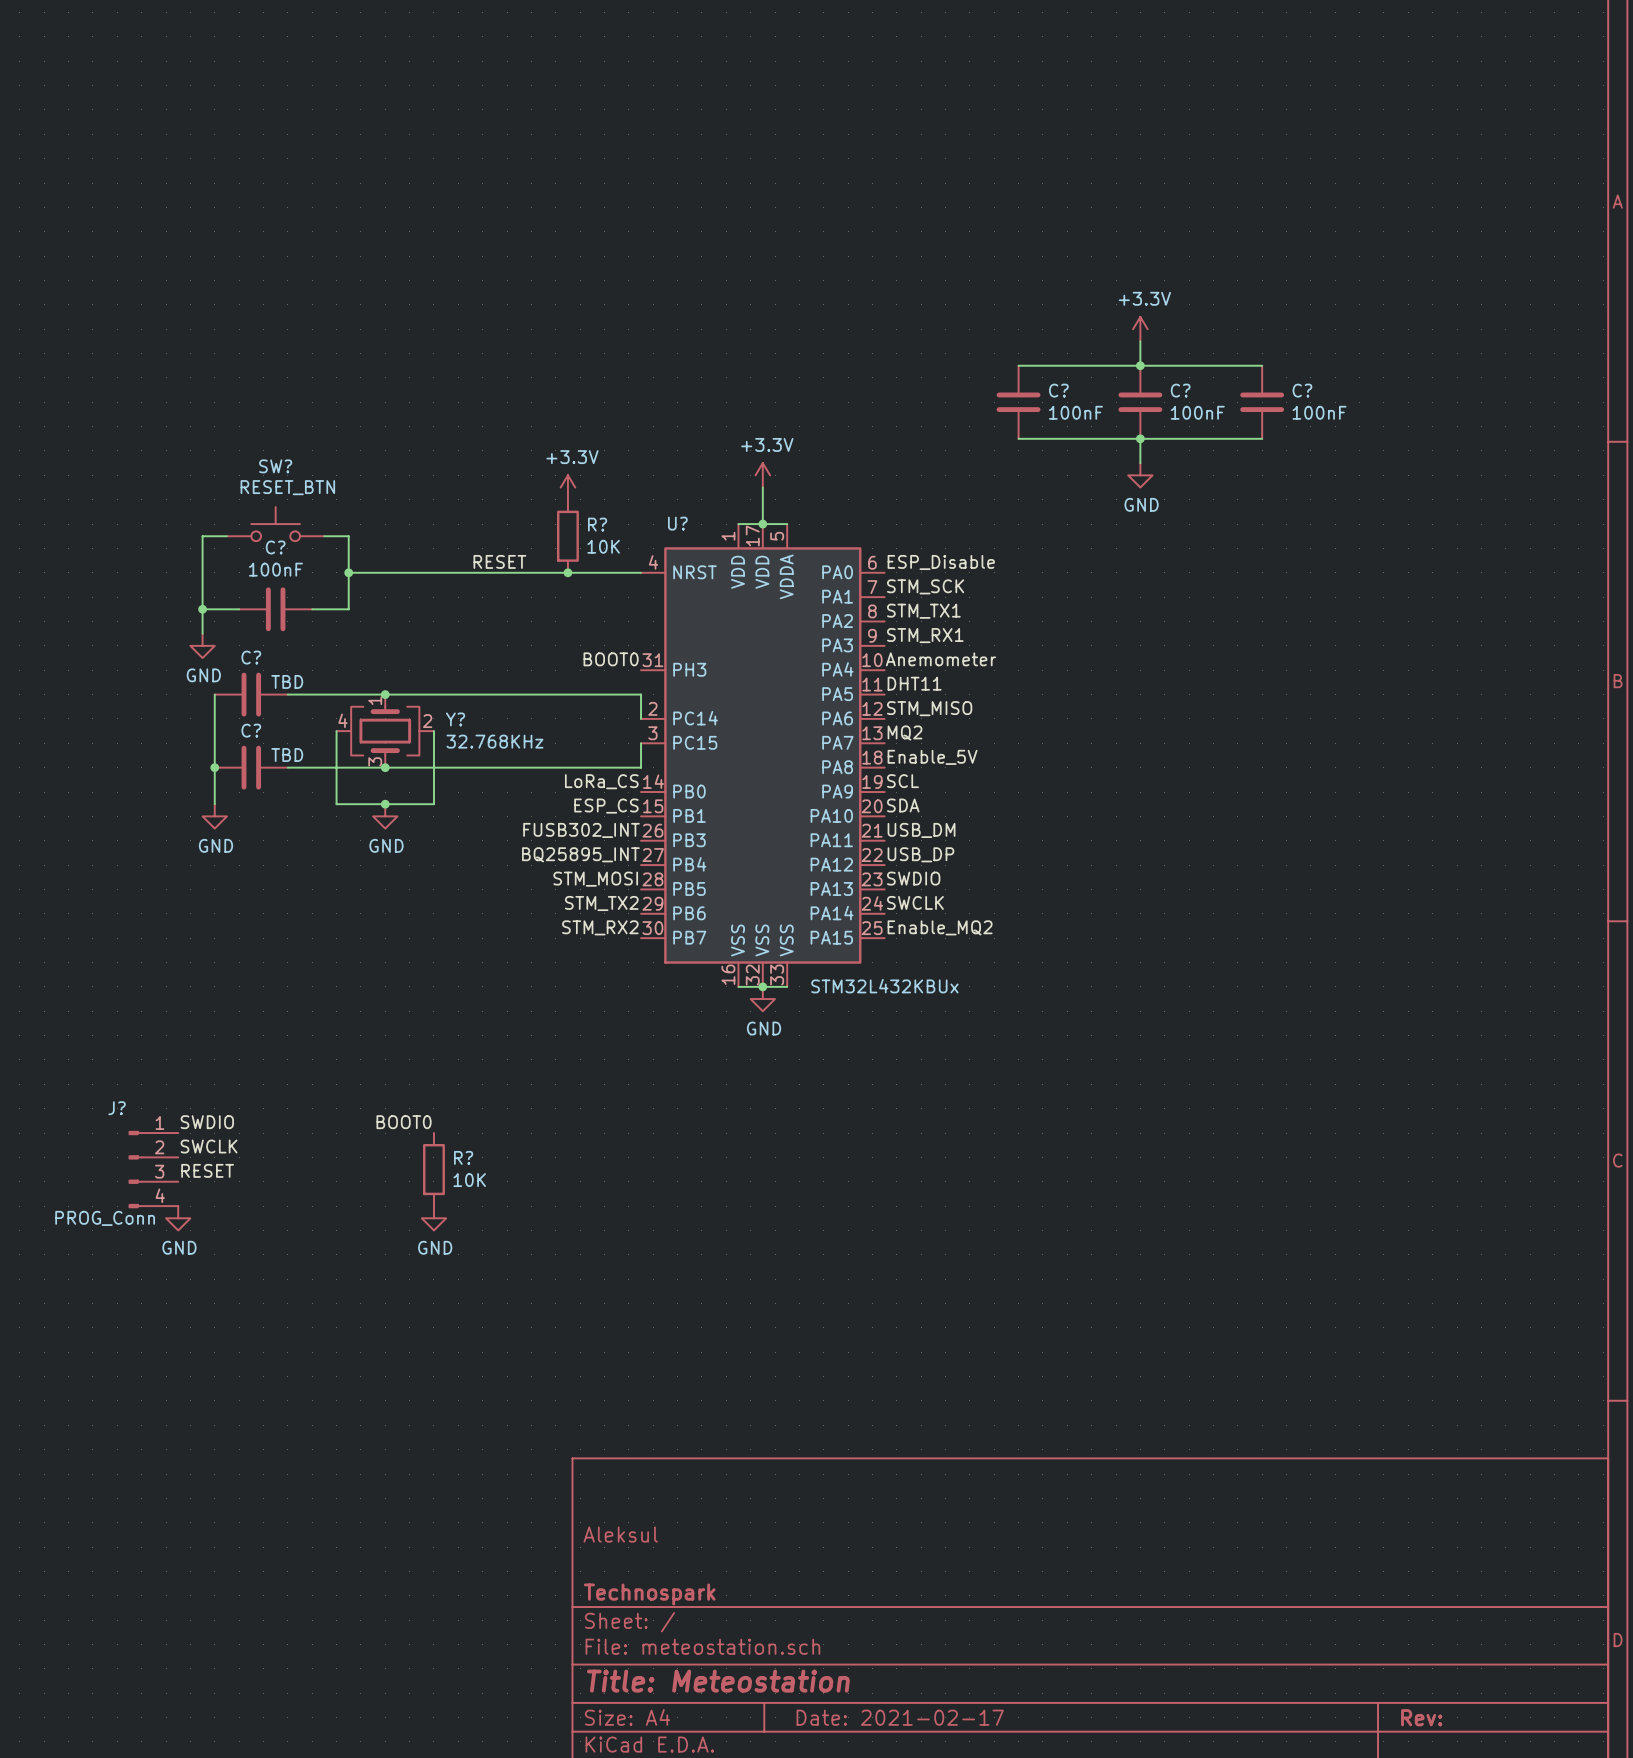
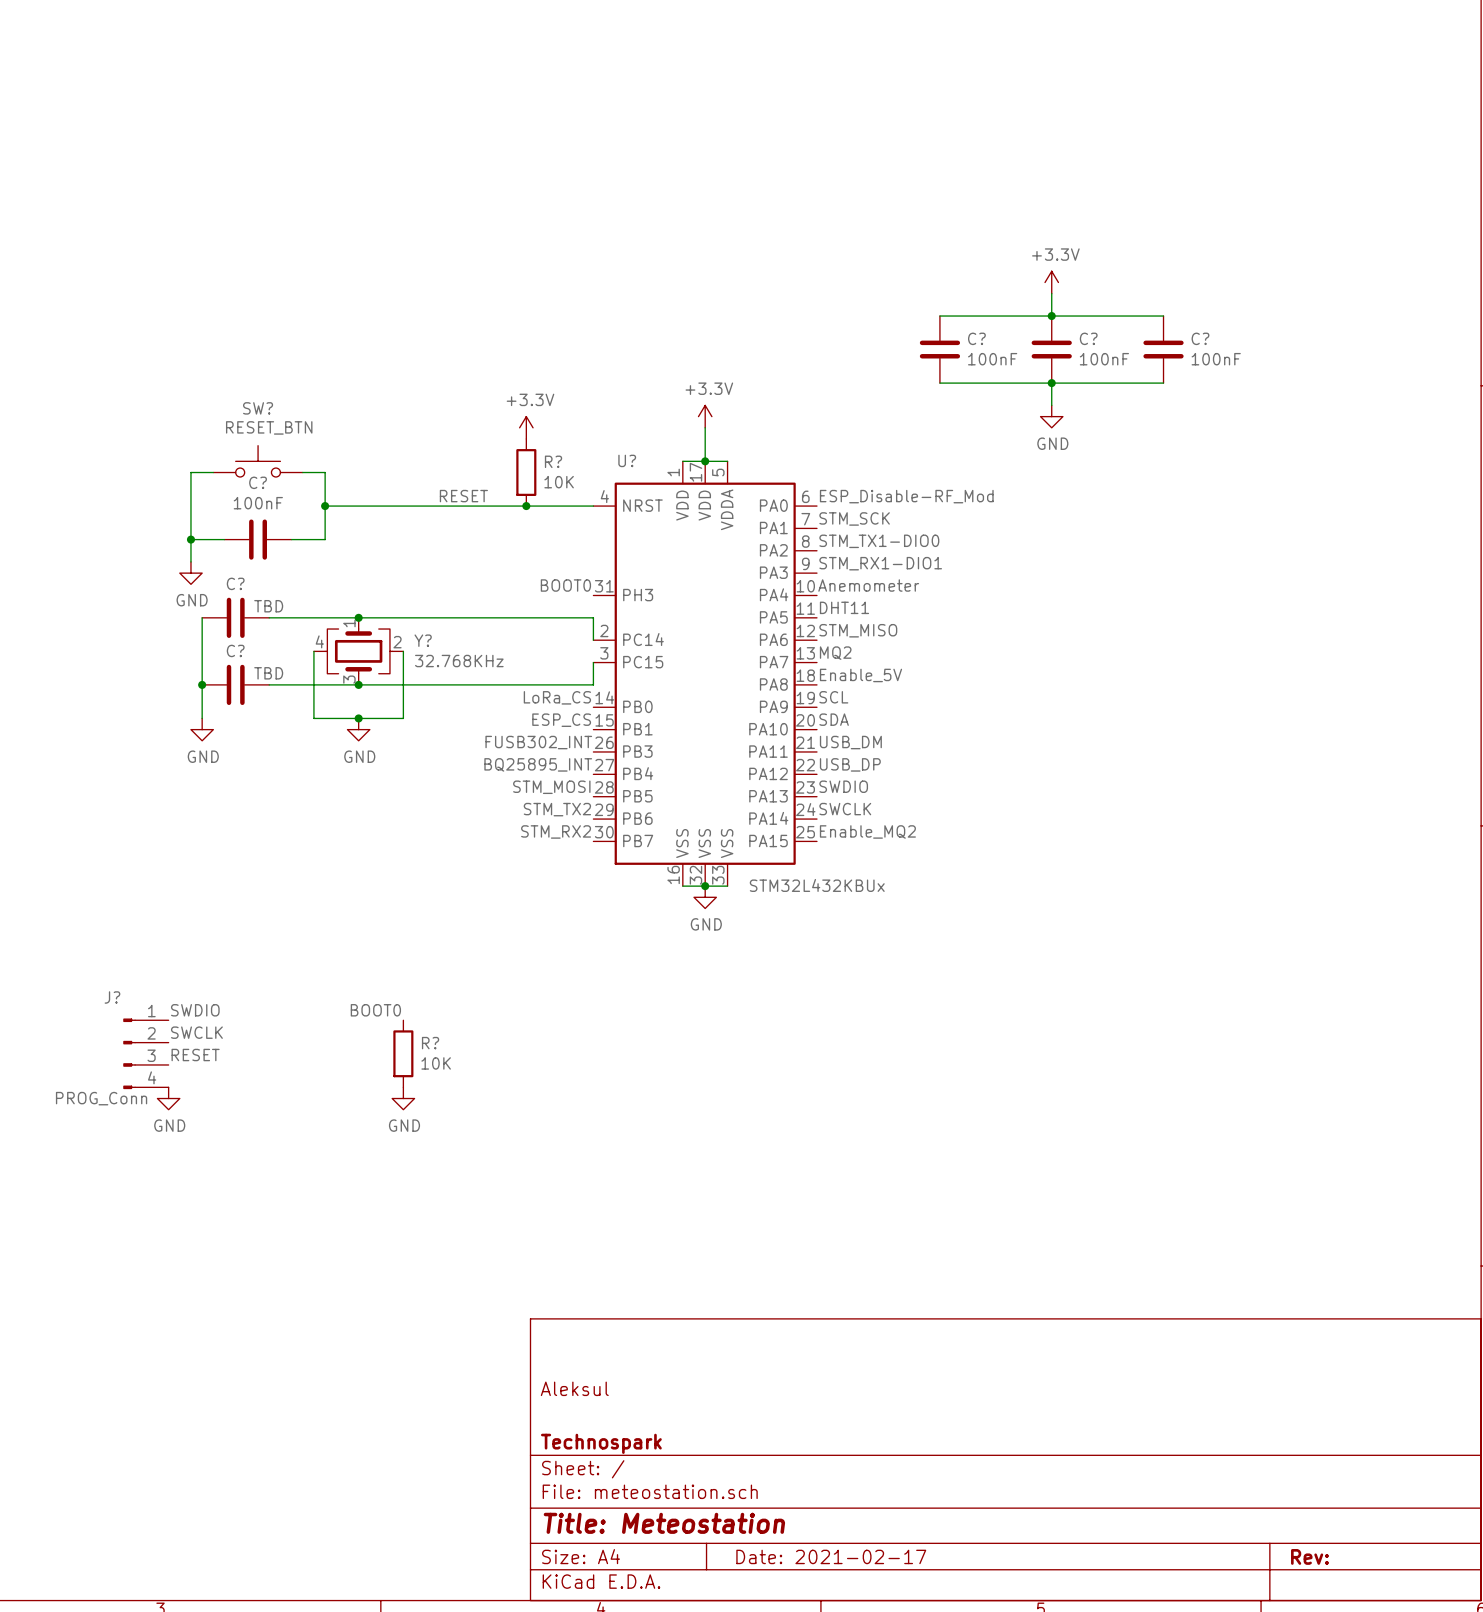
label: ESP_Disable (941, 562) -> ESP_Disable-RF_Mod (906, 496)
label: STM_TX1 (923, 611) -> STM_TX1-DIO0 (879, 541)
label: STM_RX1 (925, 635) -> STM_RX1-DIO1 (880, 563)

